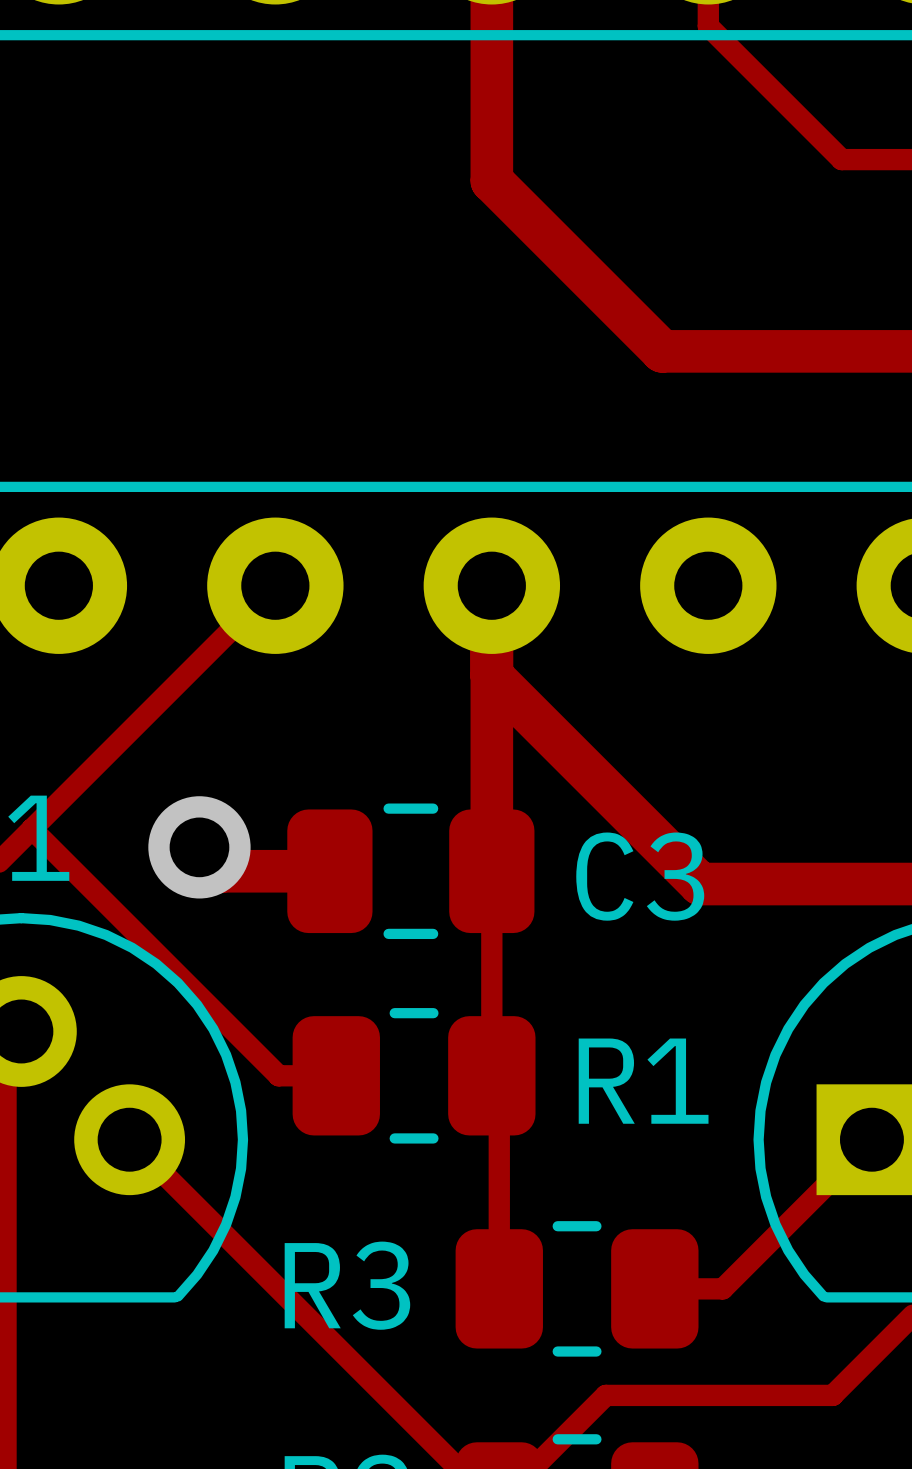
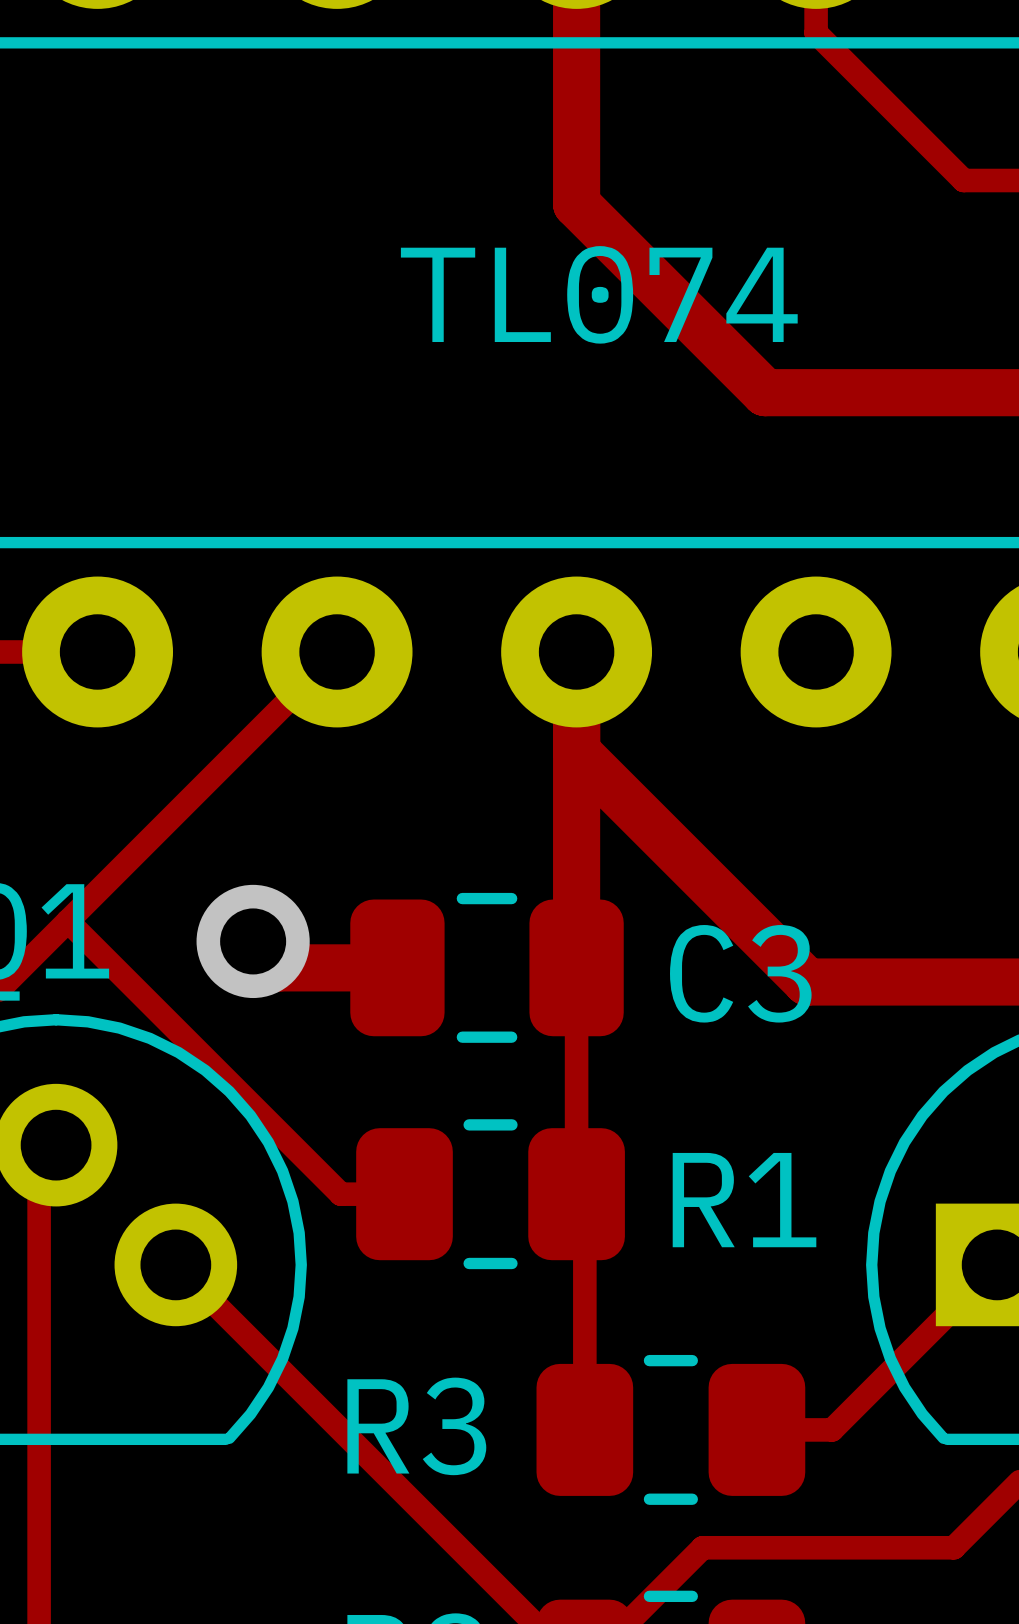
part value: none -> TL074 (599, 294)

